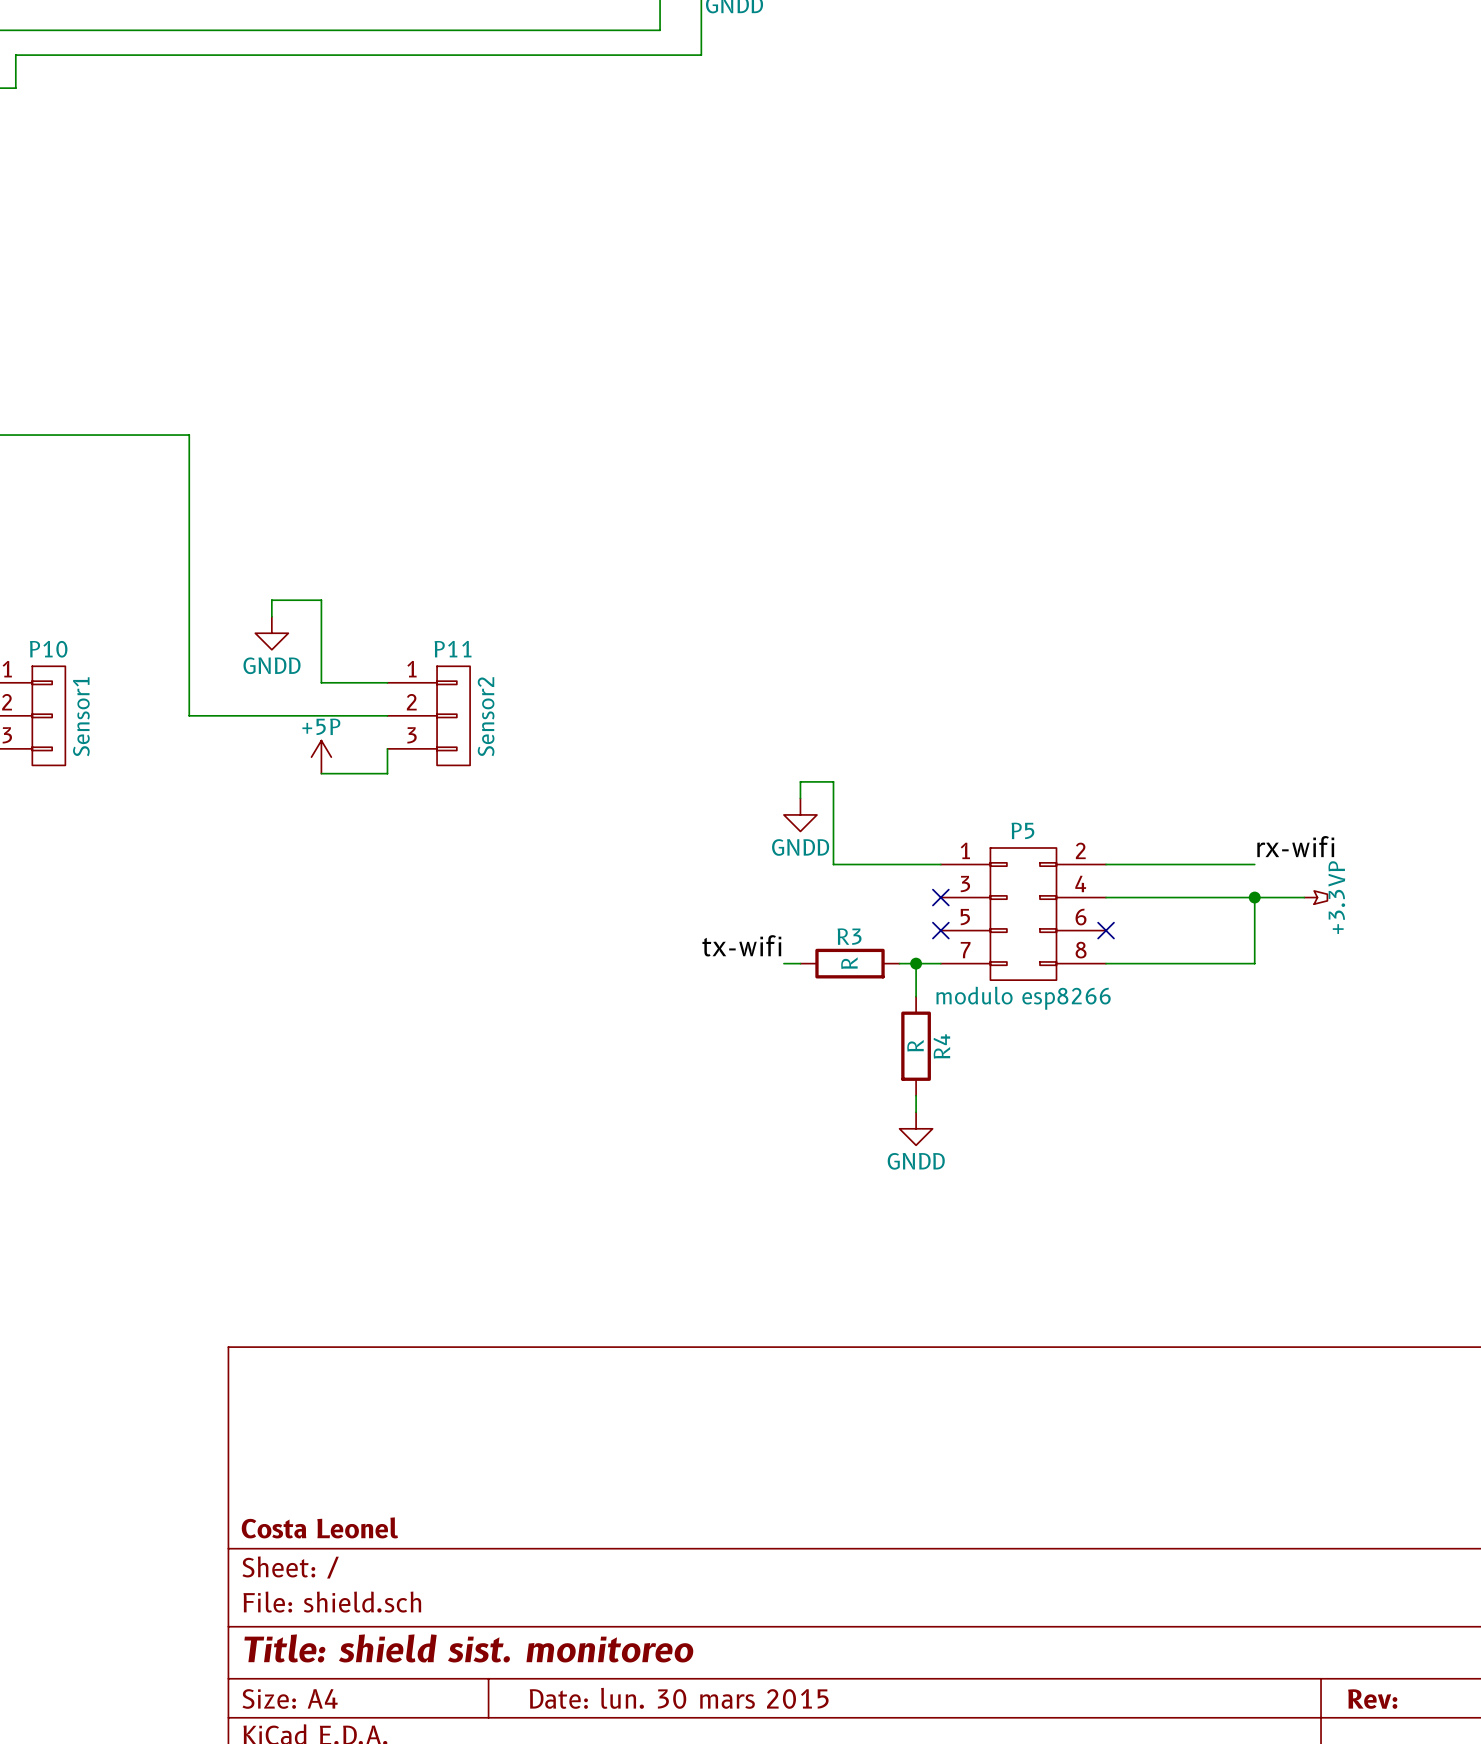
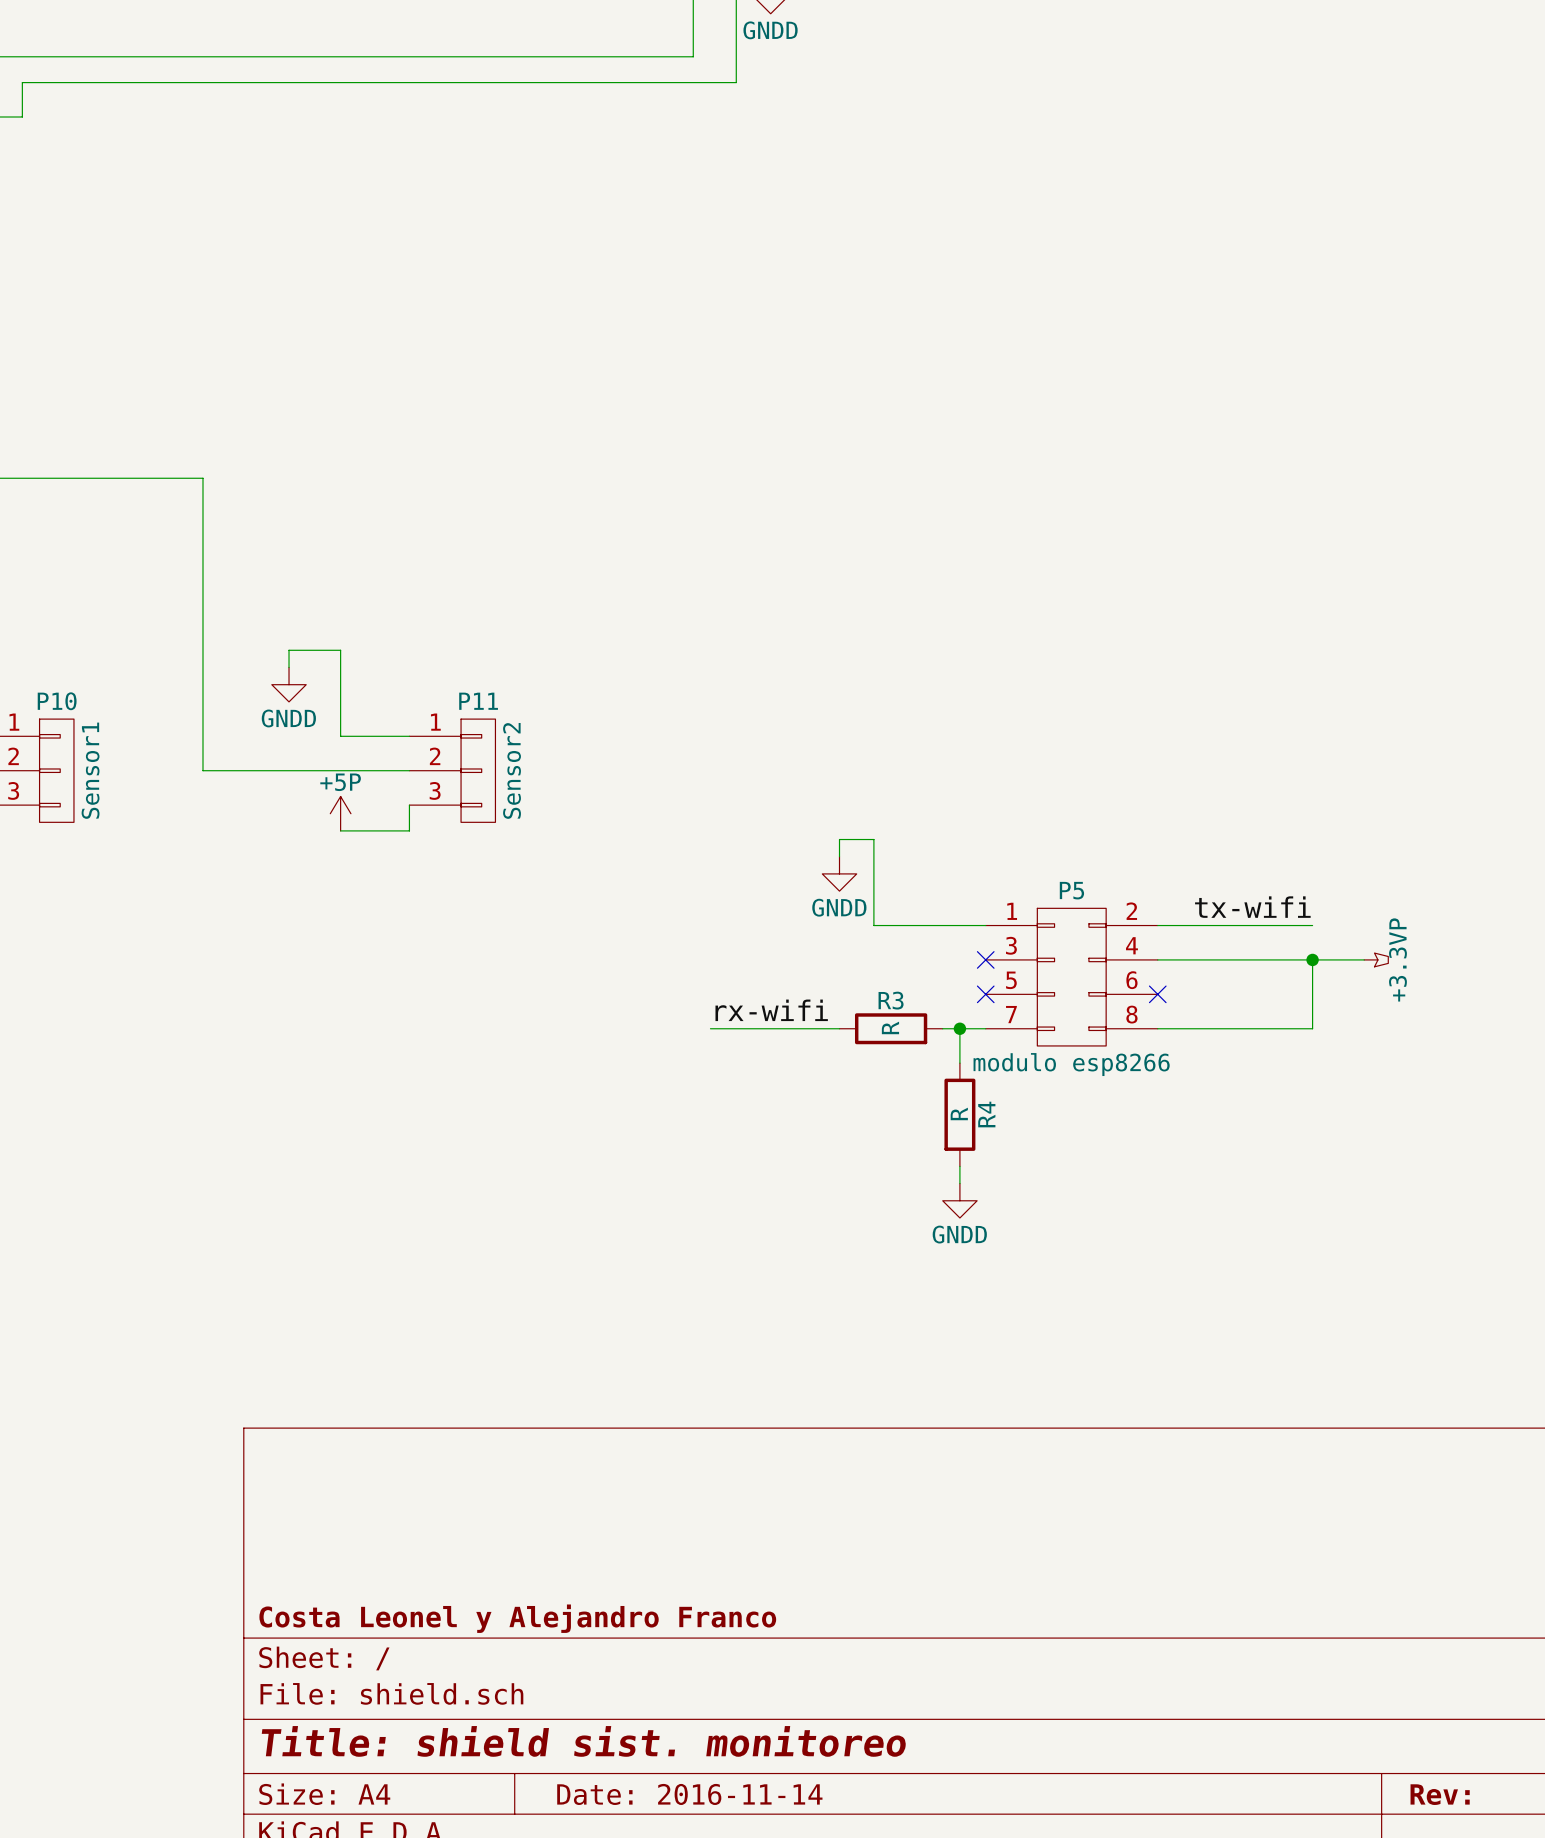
label: rx-wifi (1295, 846) -> tx-wifi (1252, 907)
label: tx-wifi (741, 945) -> rx-wifi (771, 1010)
wire: none -> (710, 1028) (822, 1028)
title block: Costa Leonel (319, 1527) -> Costa Leonel y Alejandro Franco (517, 1618)
title block: Date: lun. 30 mars 2015 (679, 1698) -> Date: 2016-11-14 (689, 1794)

